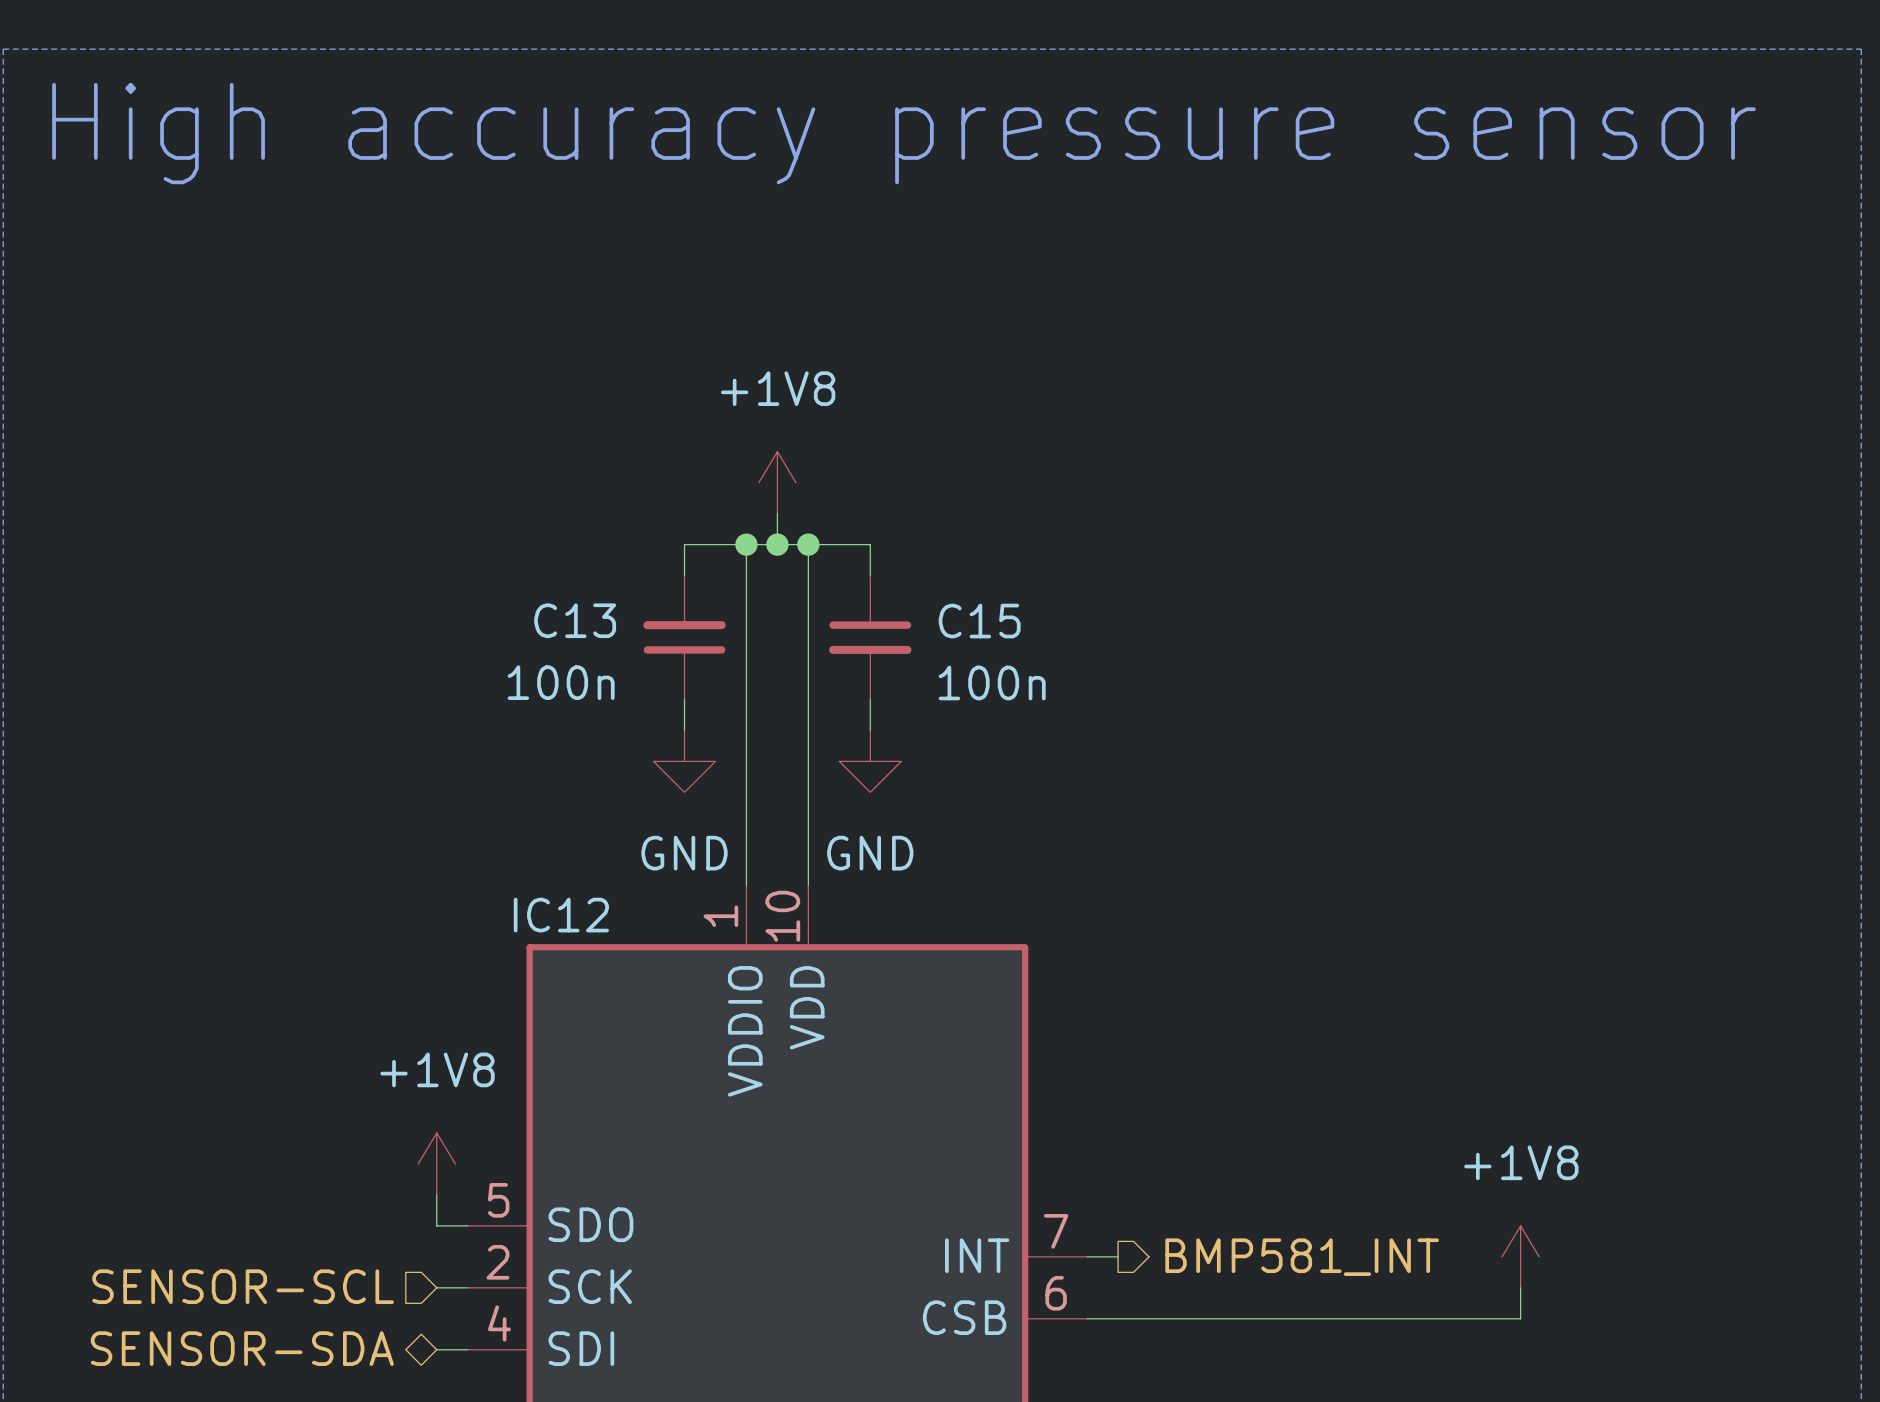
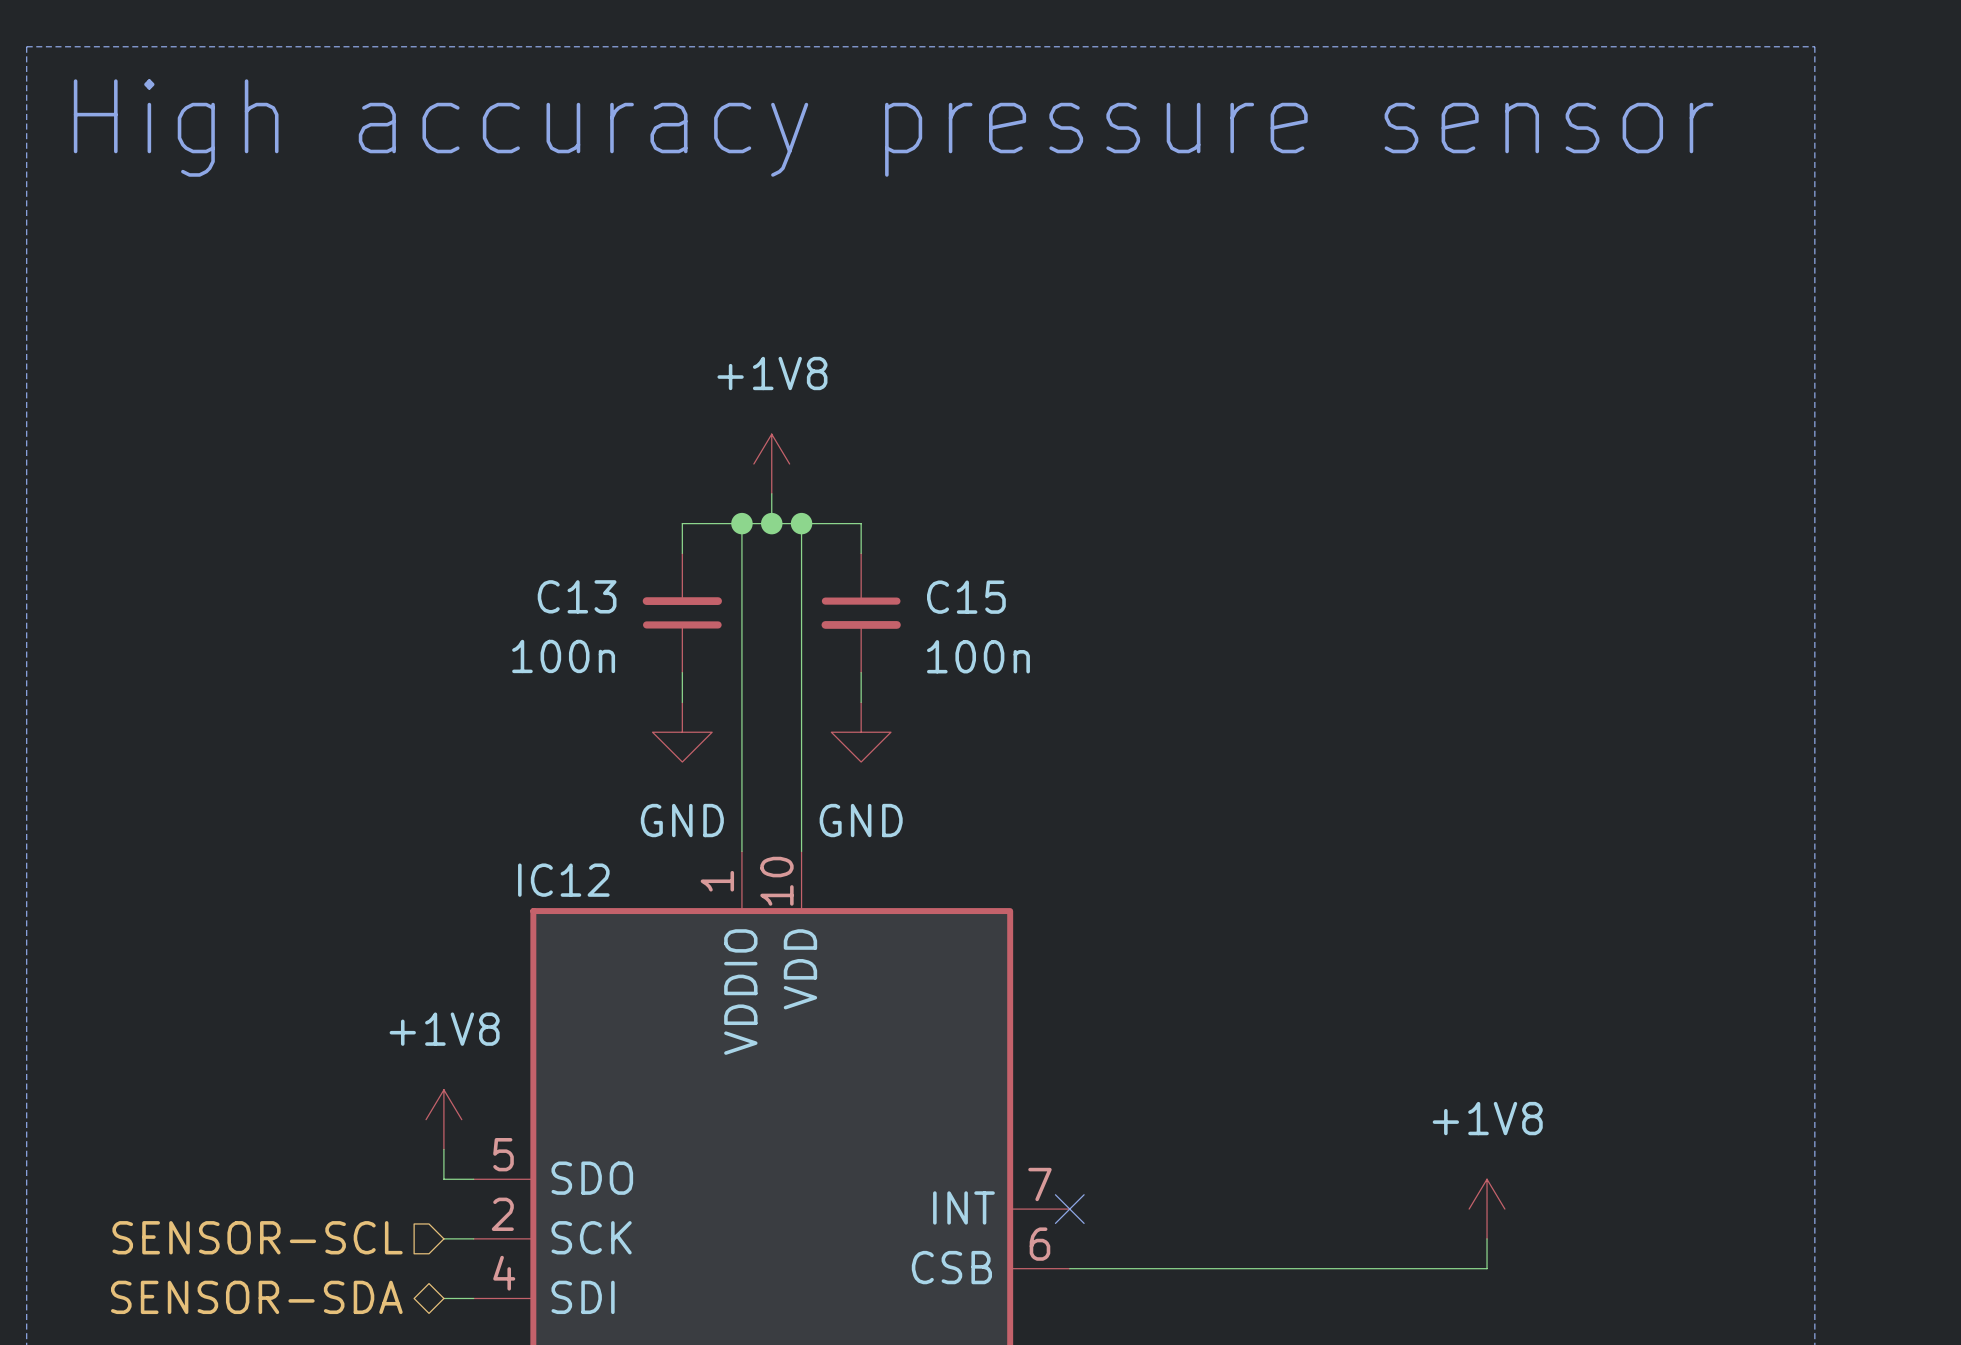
wire: (1087, 1256) (1118, 1256) -> none
no-connect mark: none -> (1069, 1209)
hierarchical label: BMP581_INT (1302, 1257) -> none

